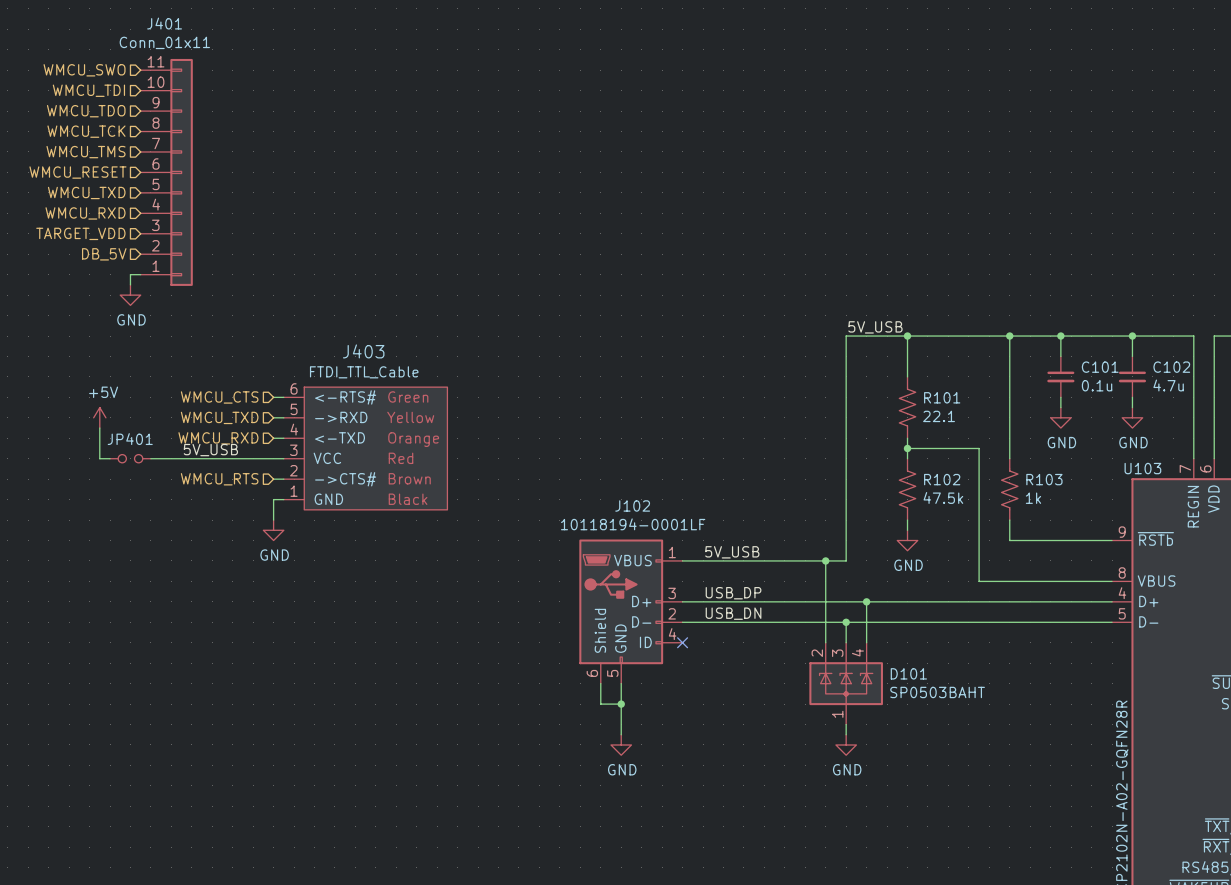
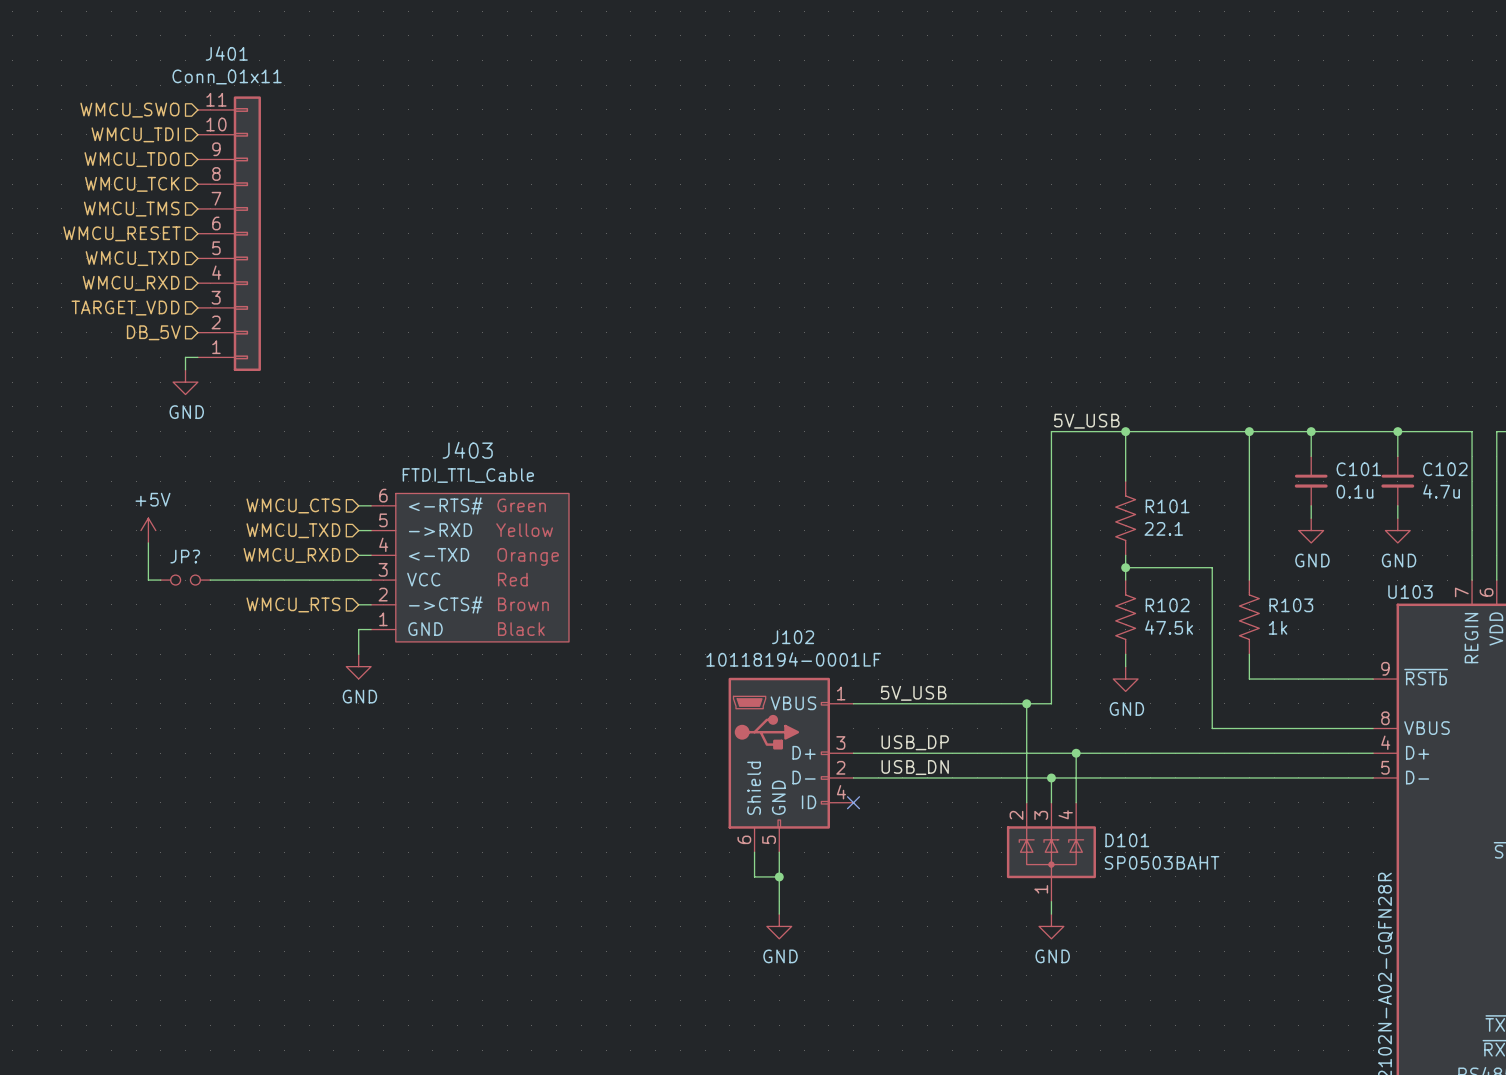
JP401 name: JP401 (130, 439) -> JP? (185, 556)
label: 5V_USB (210, 450) -> none

